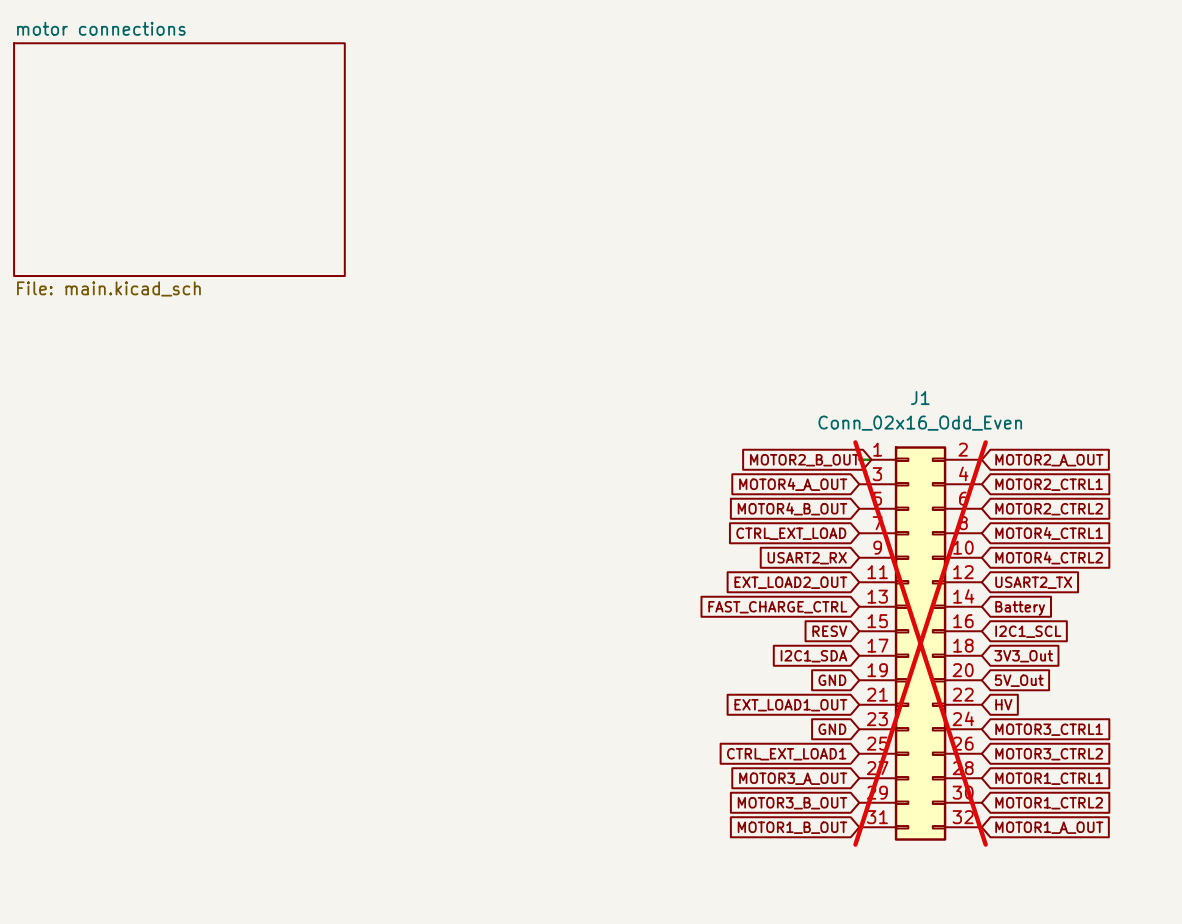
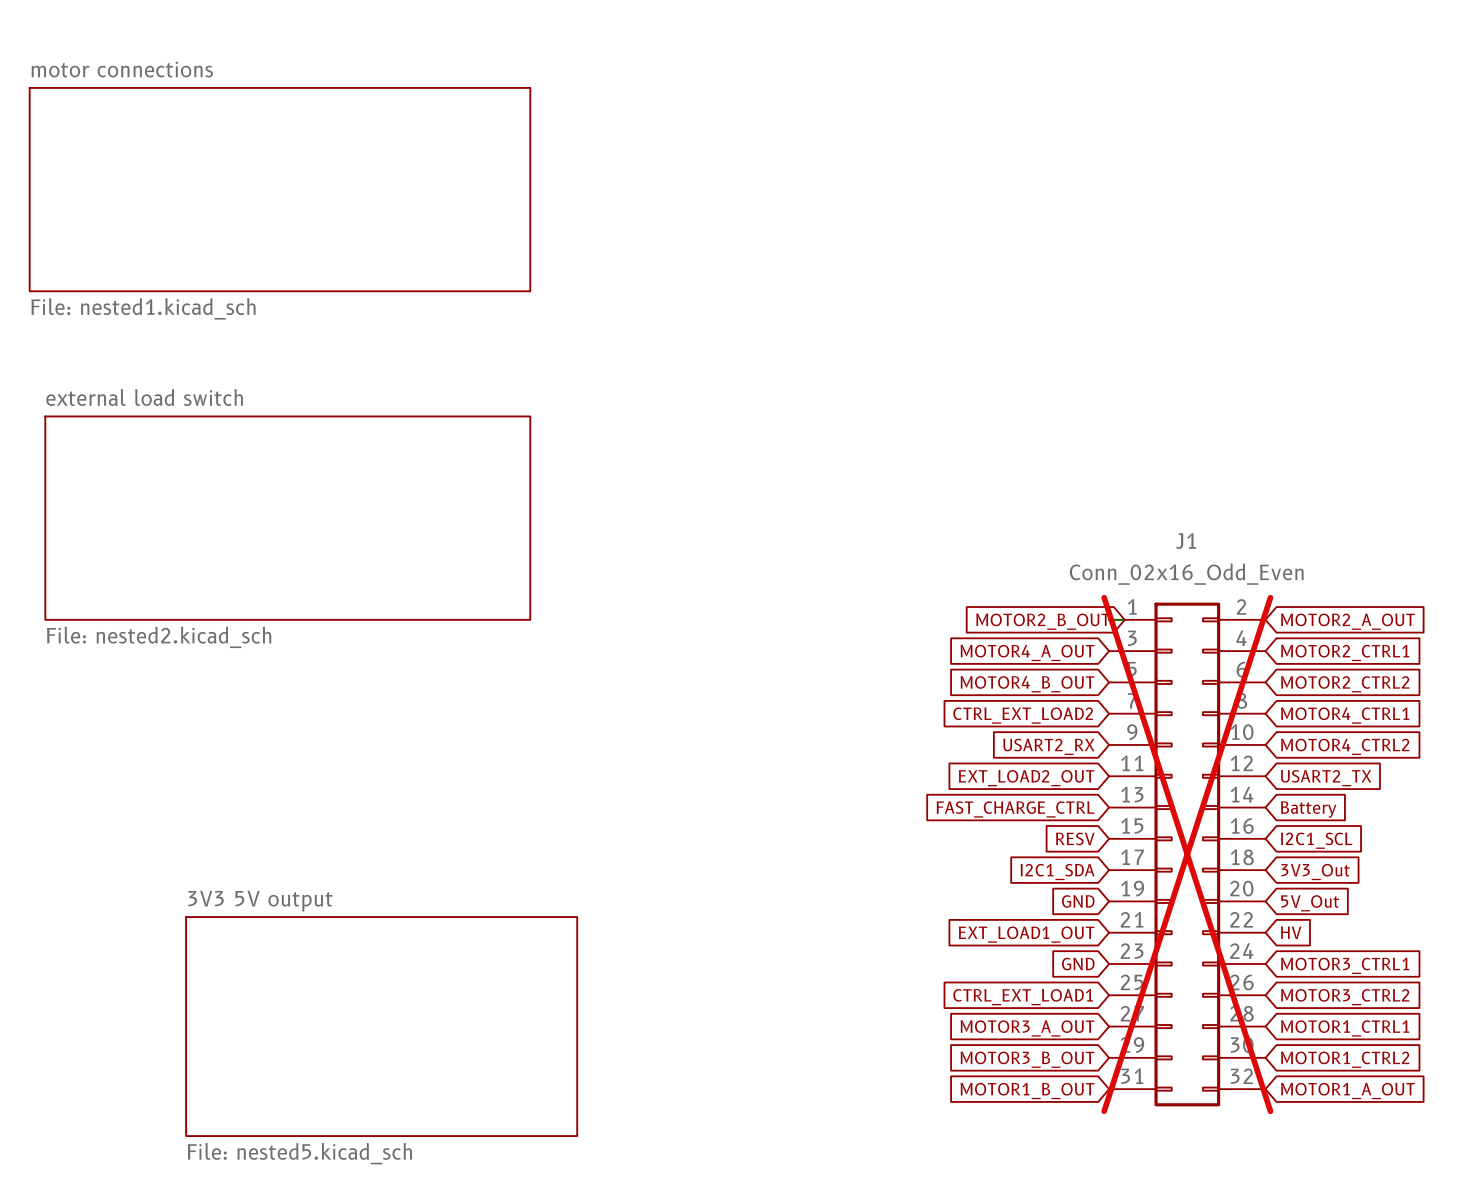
sheet motor connections: none -> File: nested1.kicad_sch (279, 189)
sheet motor connections: File: main.kicad_sch (179, 159) -> none
sheet external load switch: none -> File: nested2.kicad_sch (287, 518)
global label: CTRL_EXT_LOAD (791, 533) -> CTRL_EXT_LOAD2 (1023, 715)
sheet 3V3 5V output: none -> File: nested5.kicad_sch (381, 1026)

